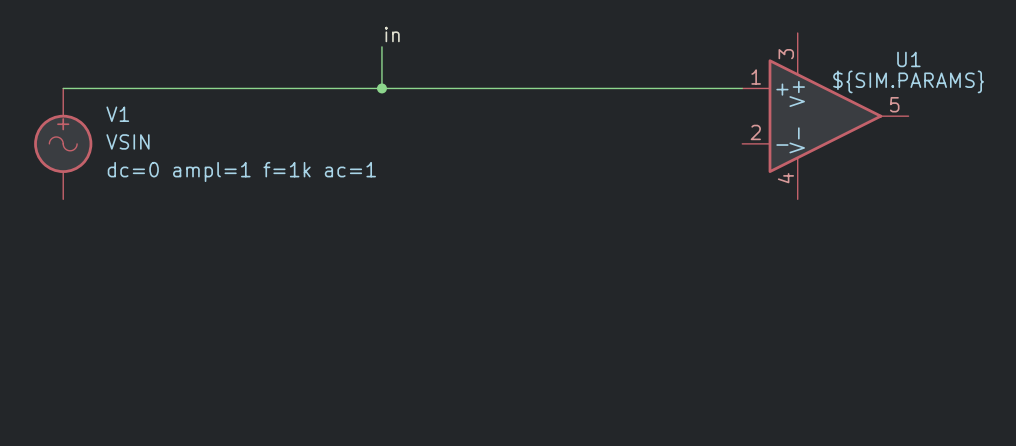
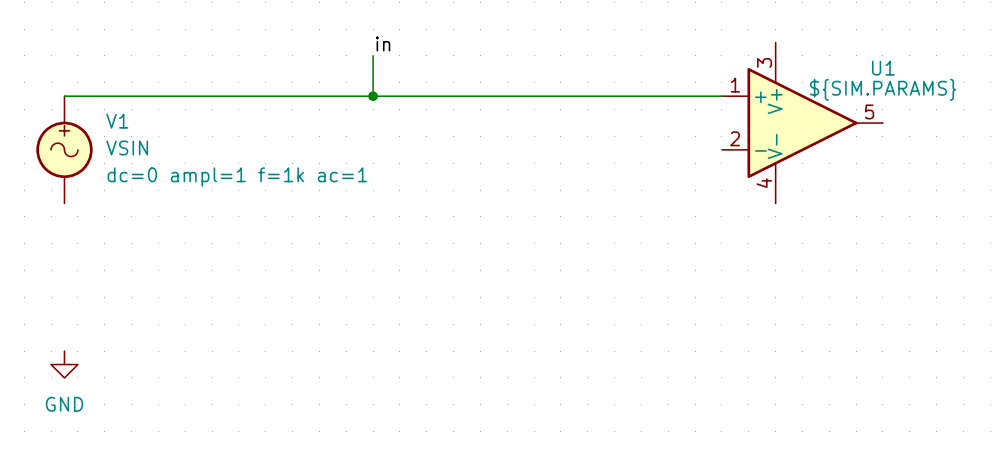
power symbol: none -> GND (64, 364)

